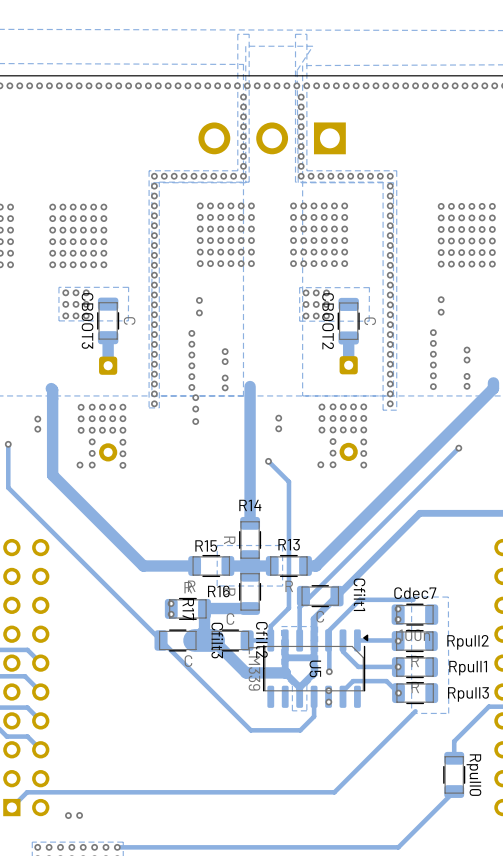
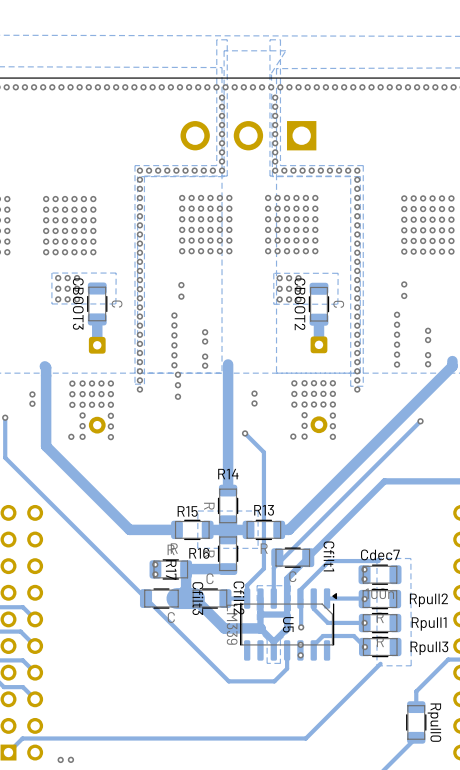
via: none -> (139, 389)
via: none -> (357, 389)

